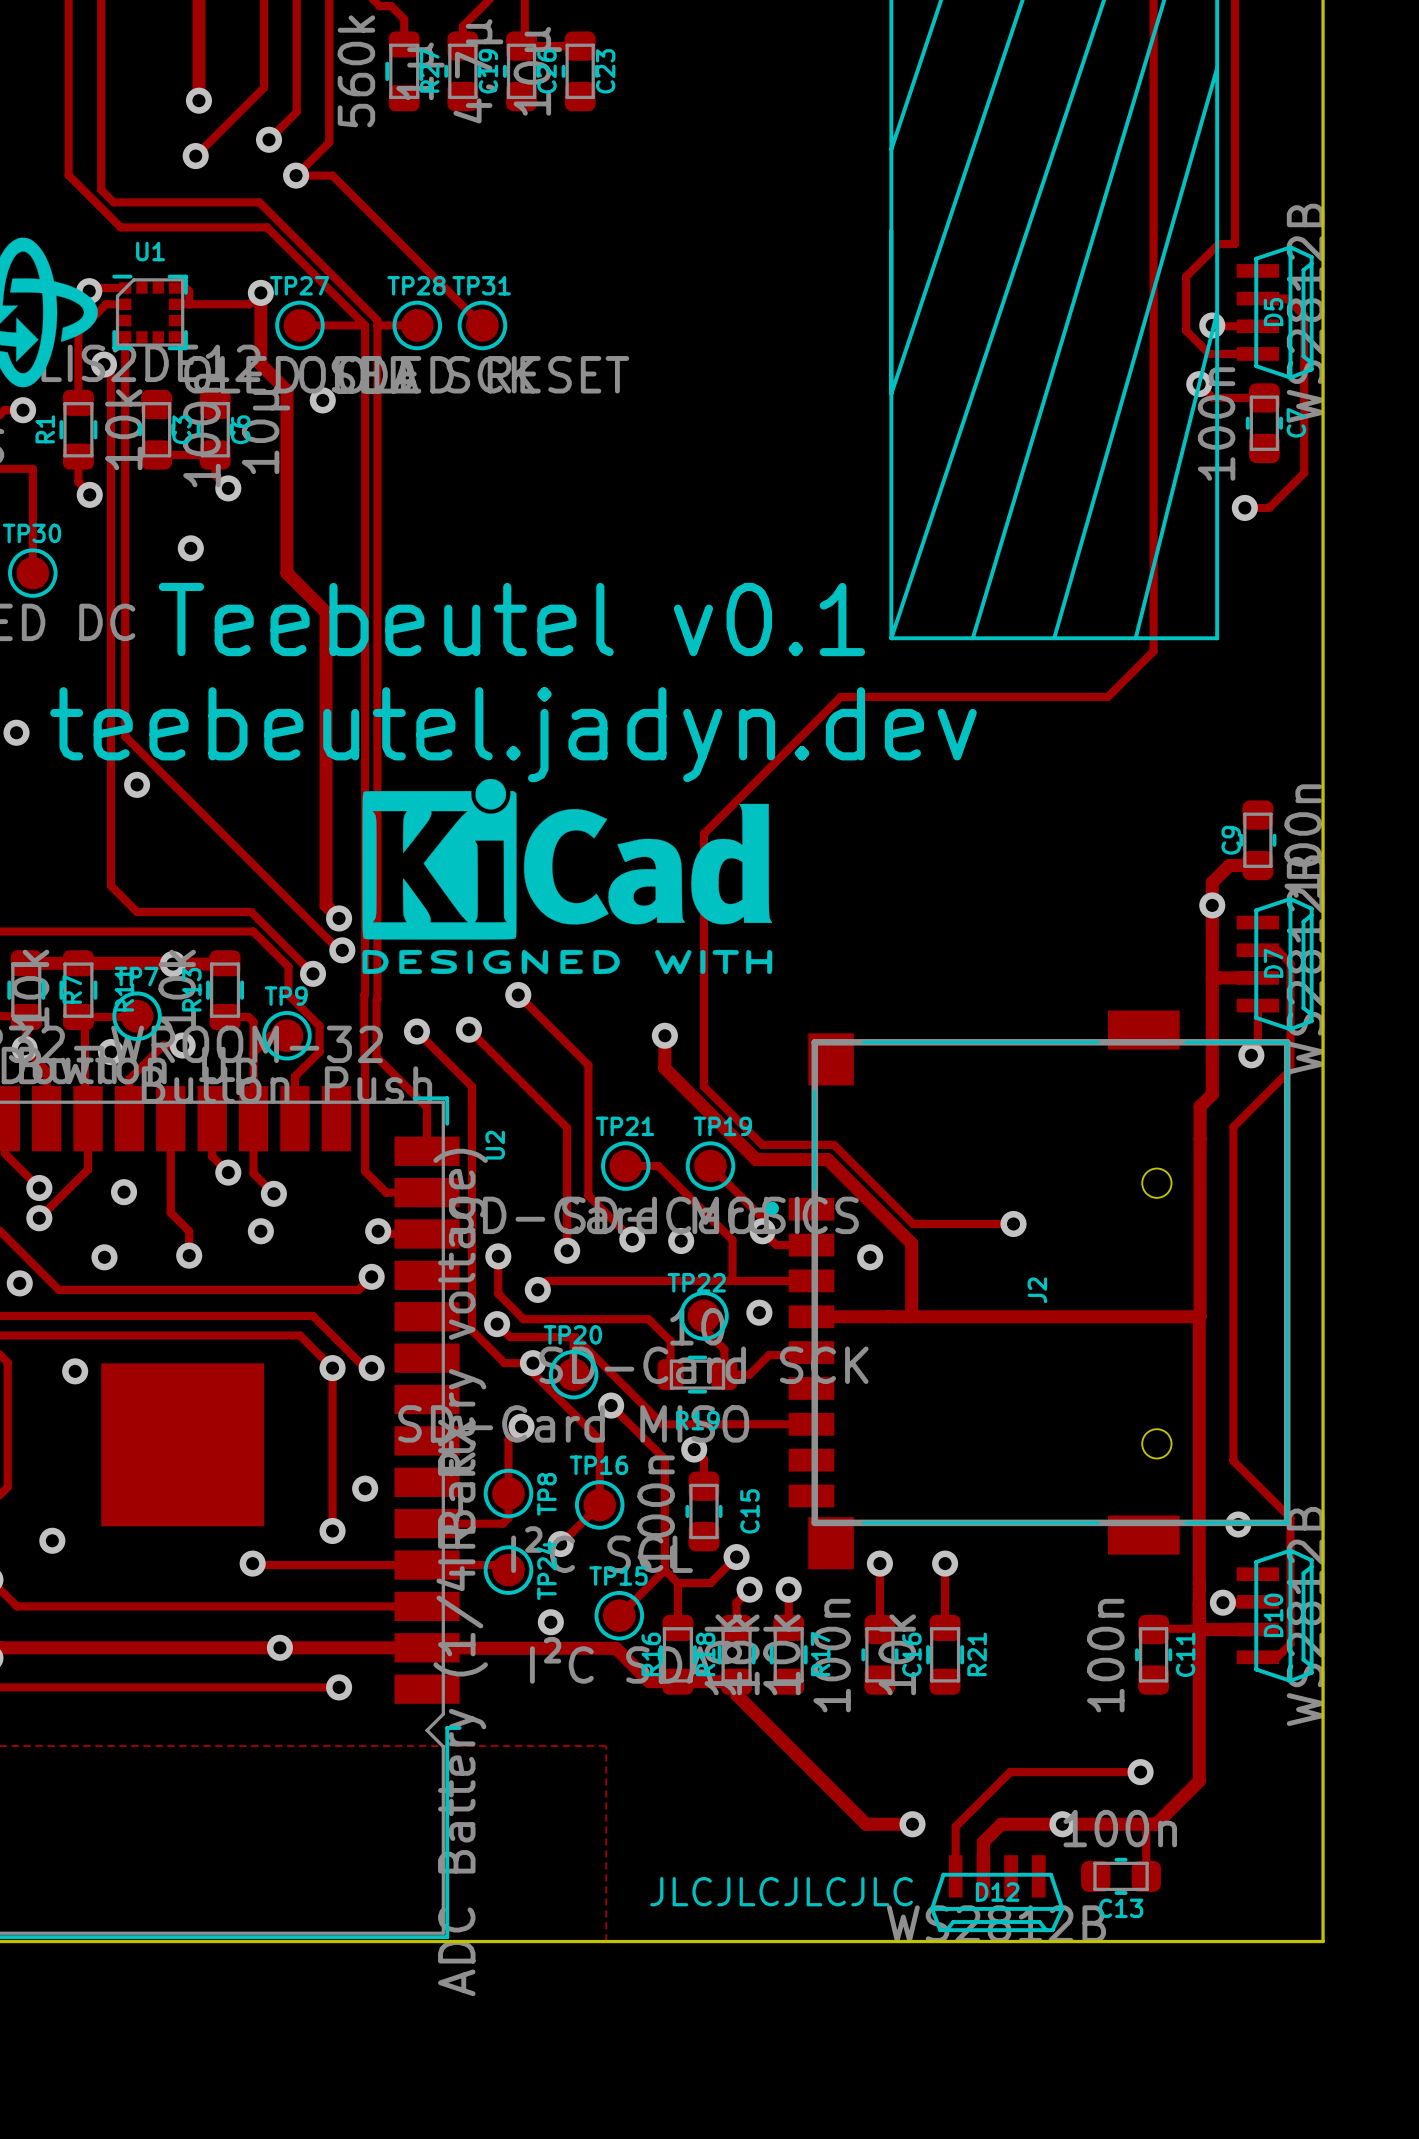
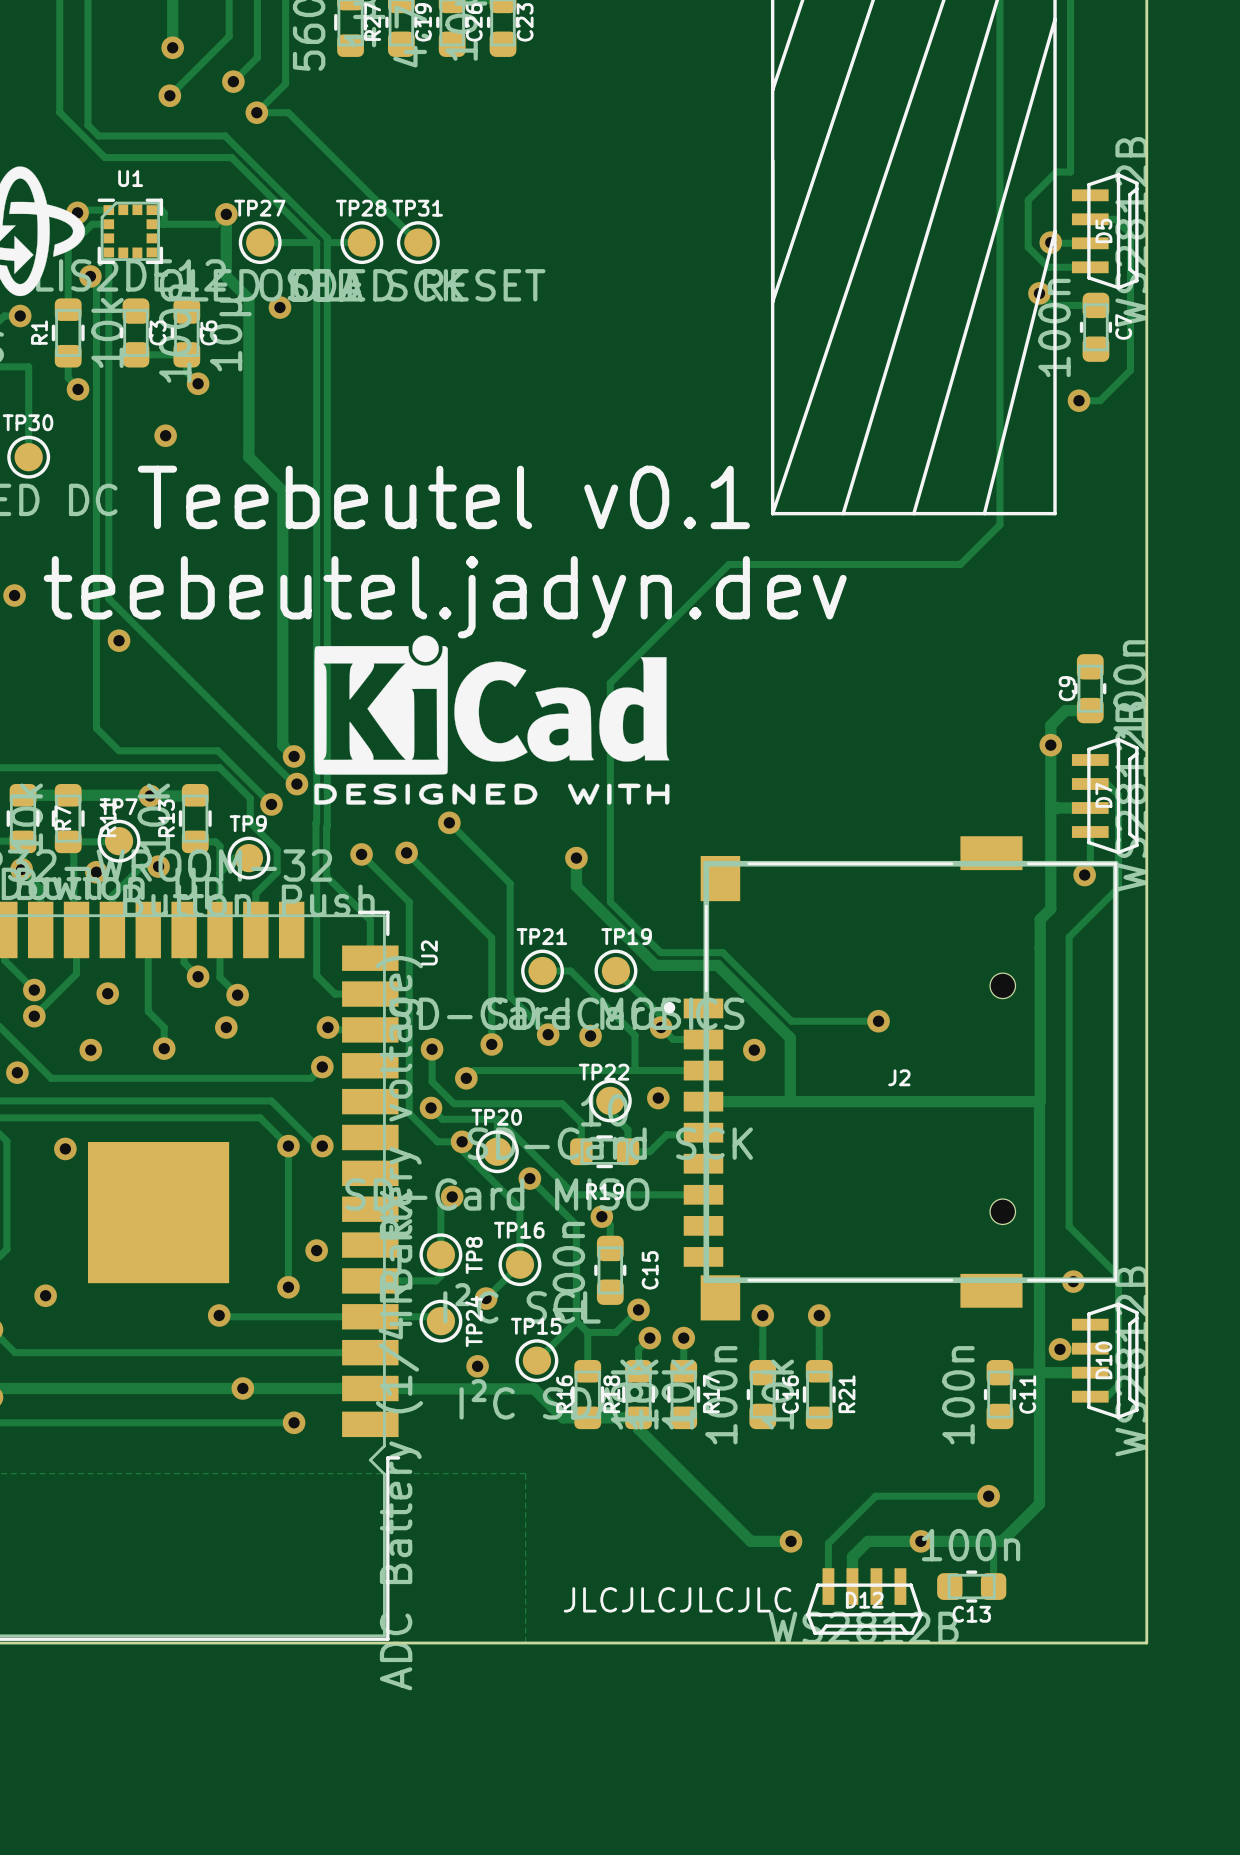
J2 name rotation: 0° (1037, 1290) -> 90° clockwise (899, 1077)

